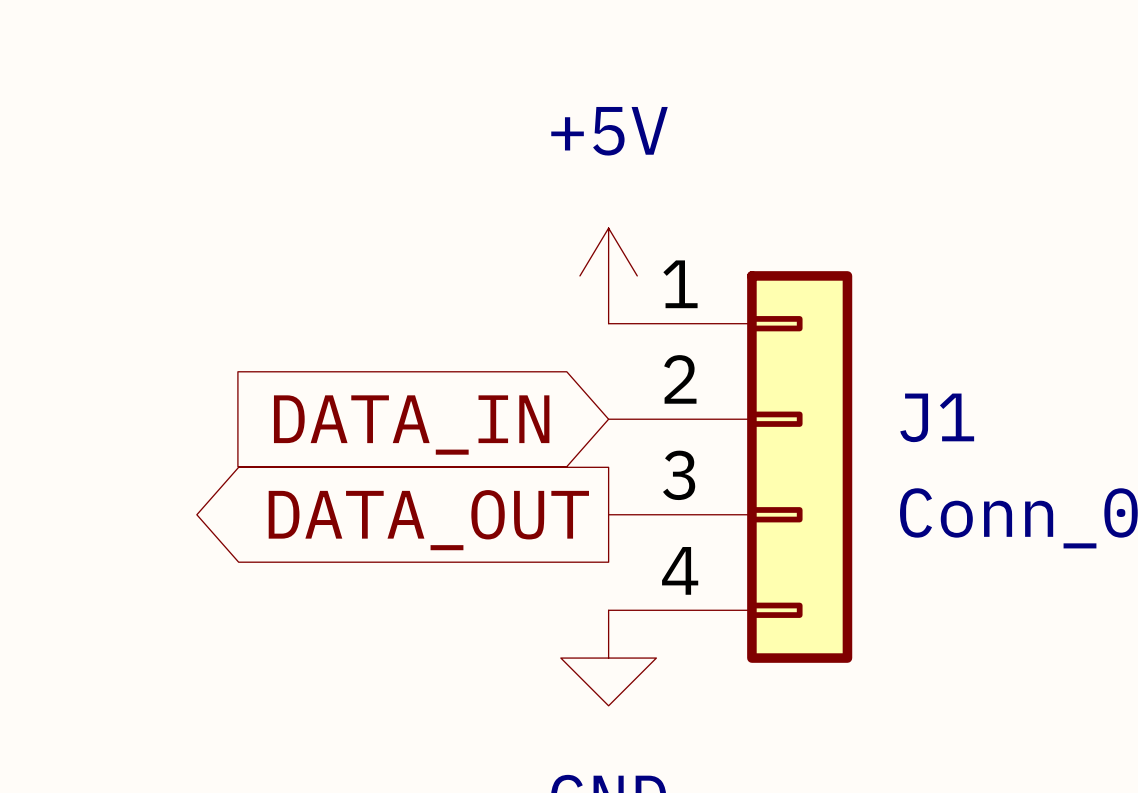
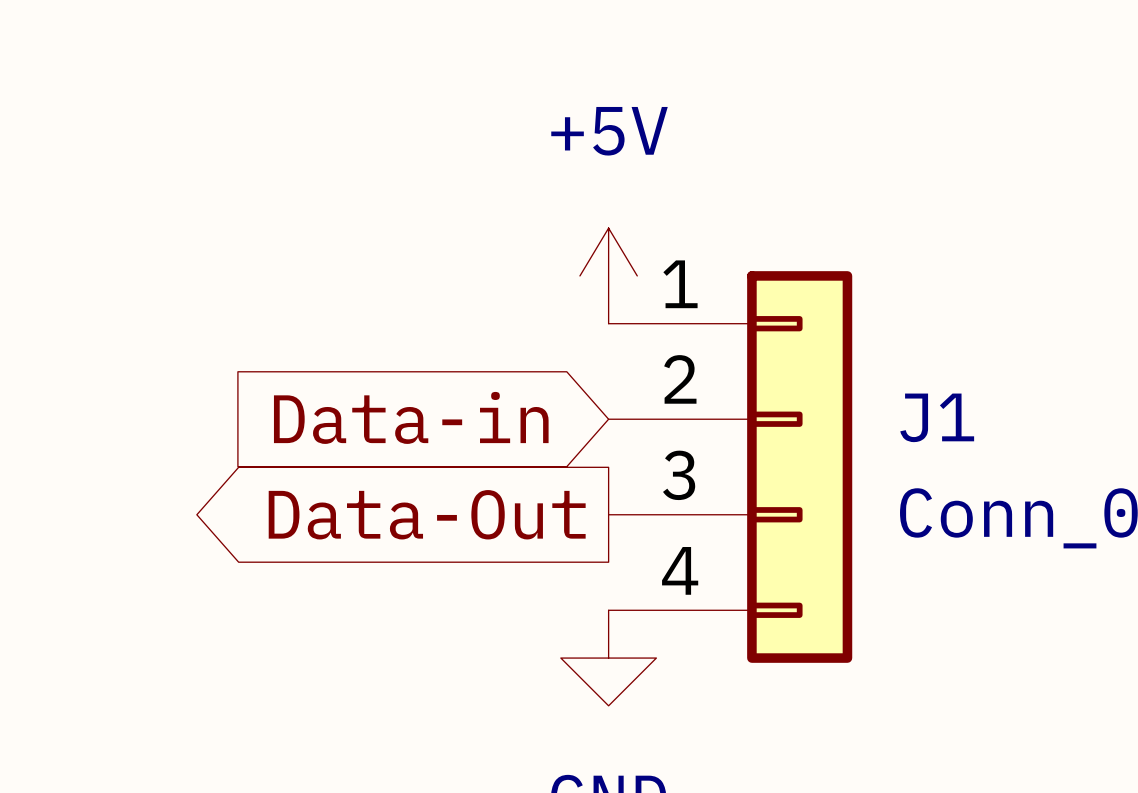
global label: DATA_IN (411, 425) -> Data-in (411, 417)
global label: DATA_OUT (428, 520) -> Data-Out (427, 514)

